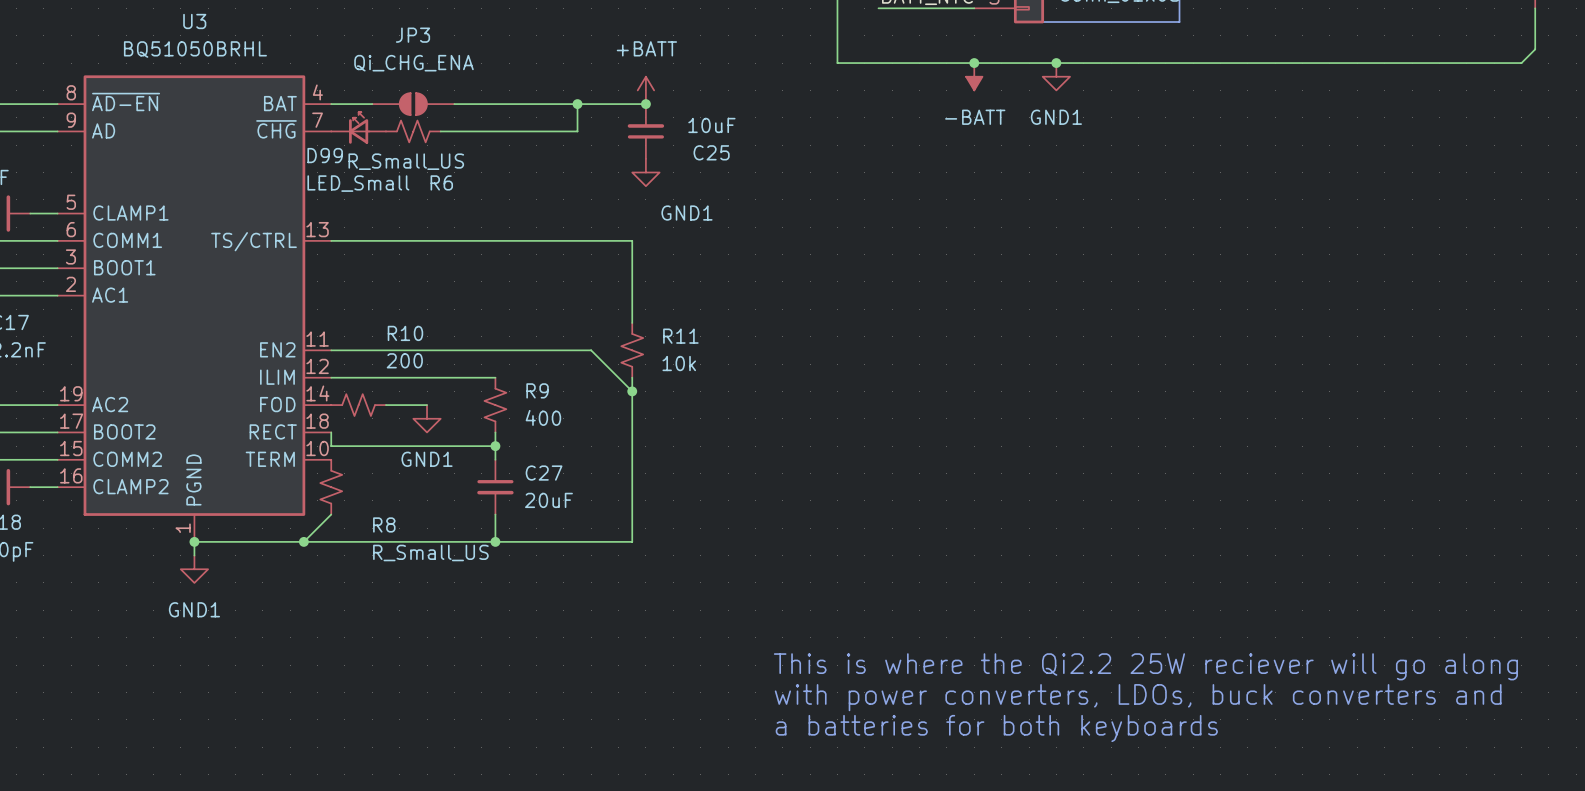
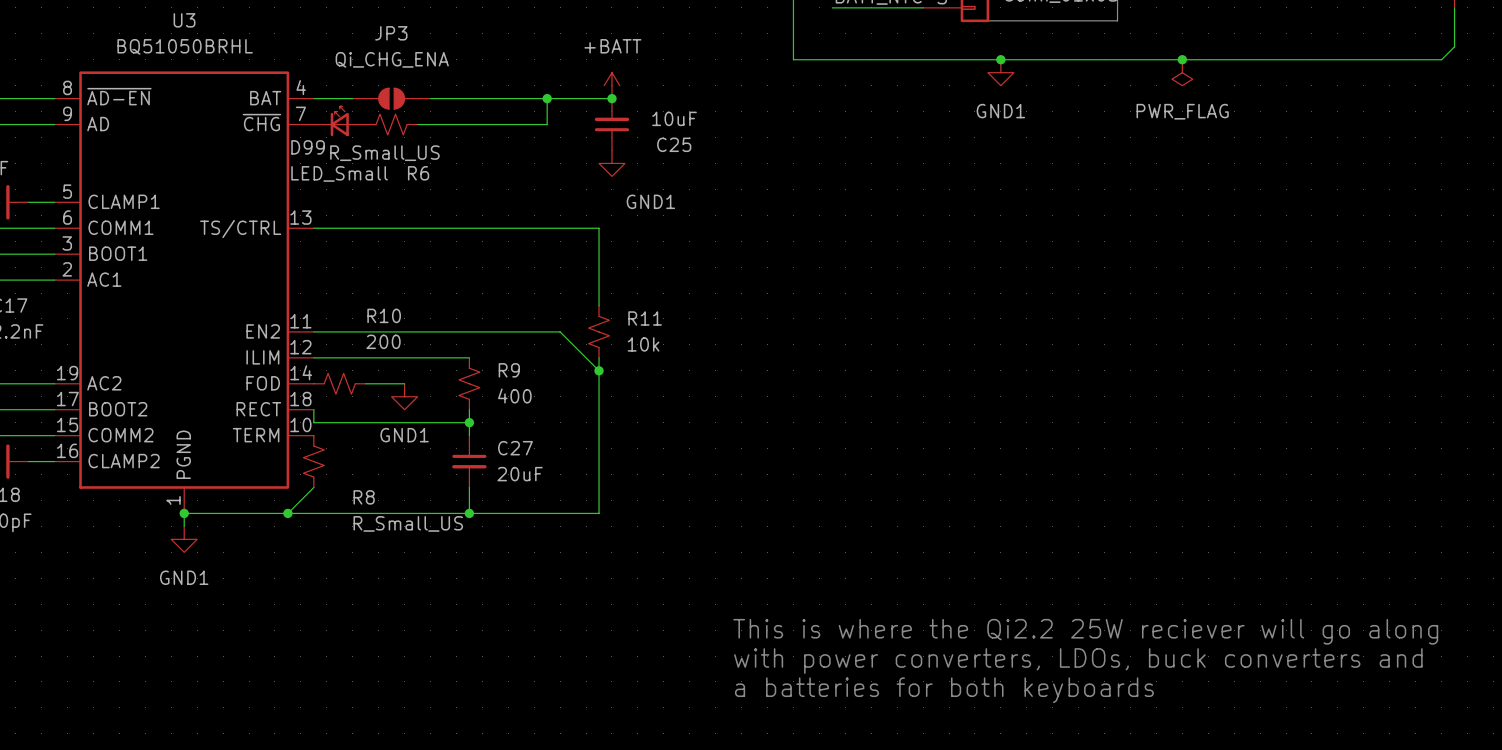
junction: (974, 63) -> none
junction: none -> (1182, 59)
power symbol: -BATT (974, 76) -> none
power symbol: none -> PWR_FLAG (1182, 72)

